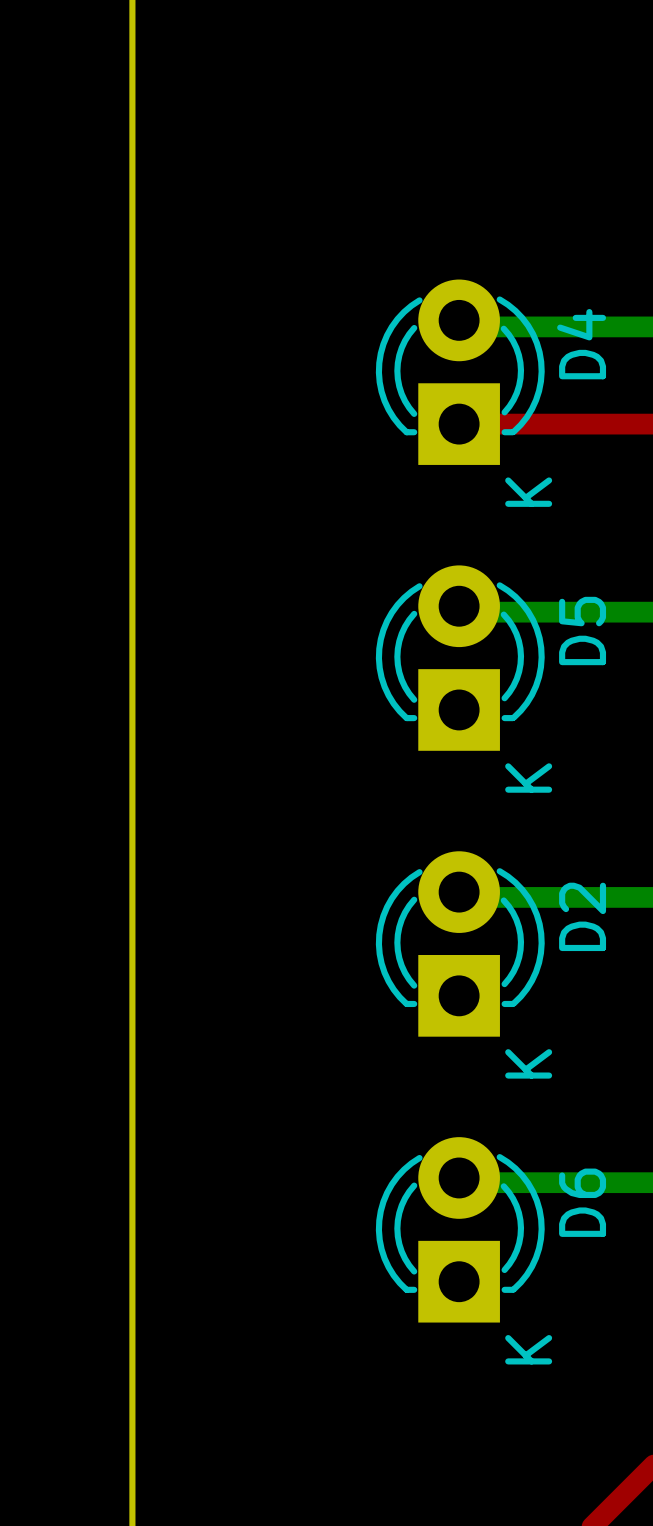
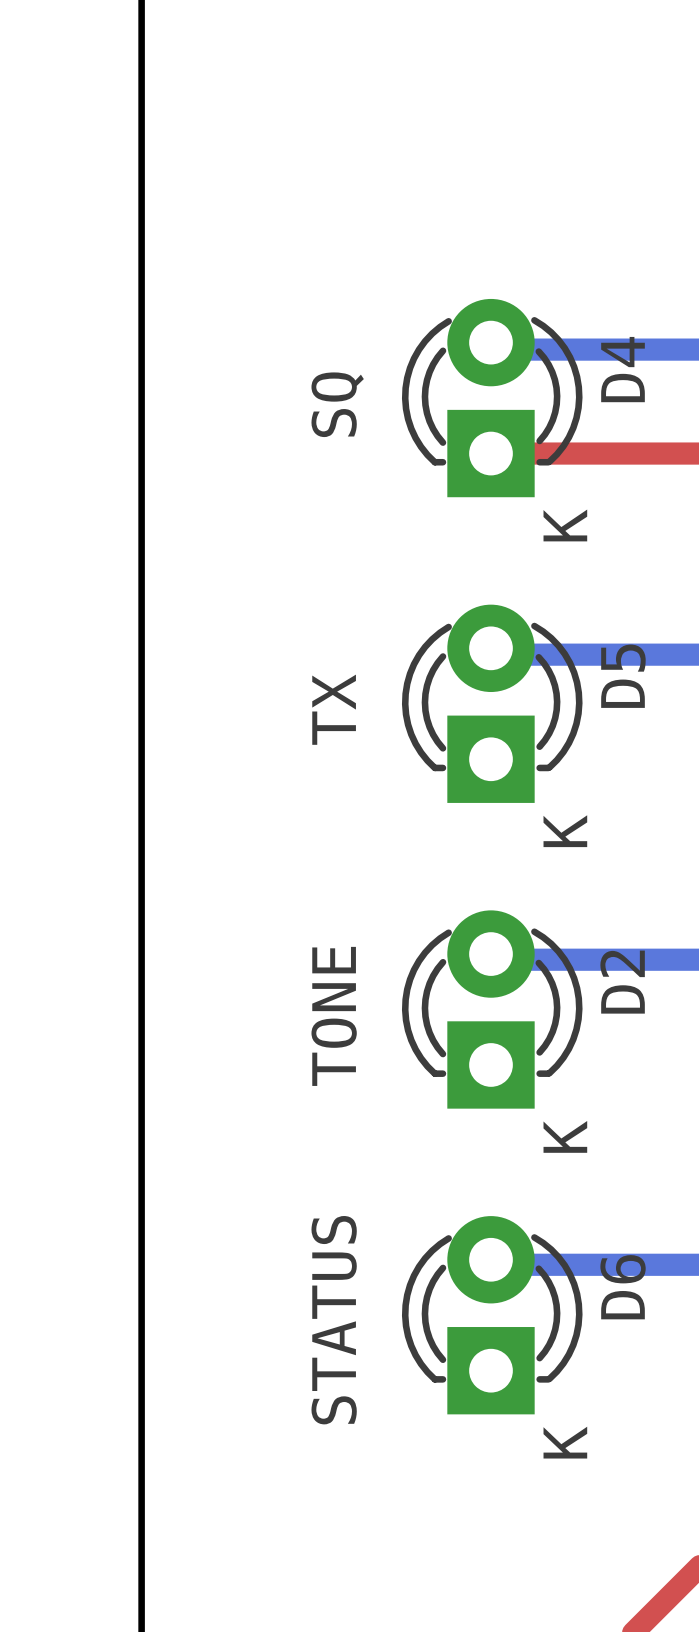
text: none -> SQ (337, 404)
text: none -> TX (334, 709)
text: none -> TONE (334, 1016)
text: none -> STATUS (334, 1320)

